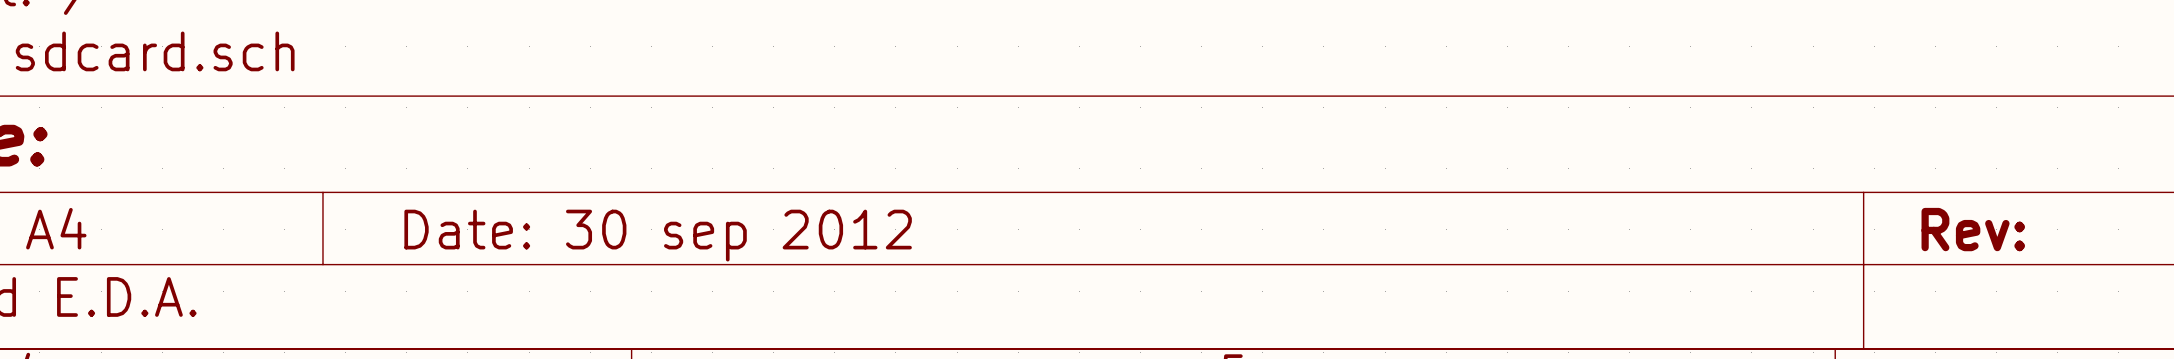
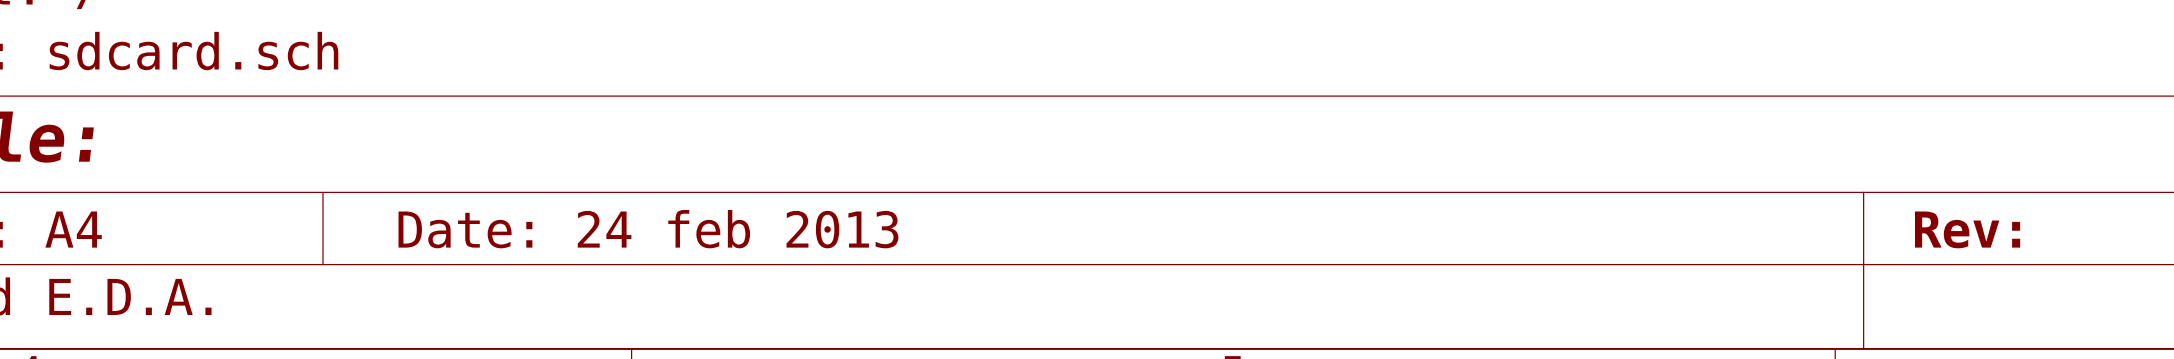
title block: Date: 30 sep 2012 (658, 235) -> Date: 24 feb 2013 (648, 229)

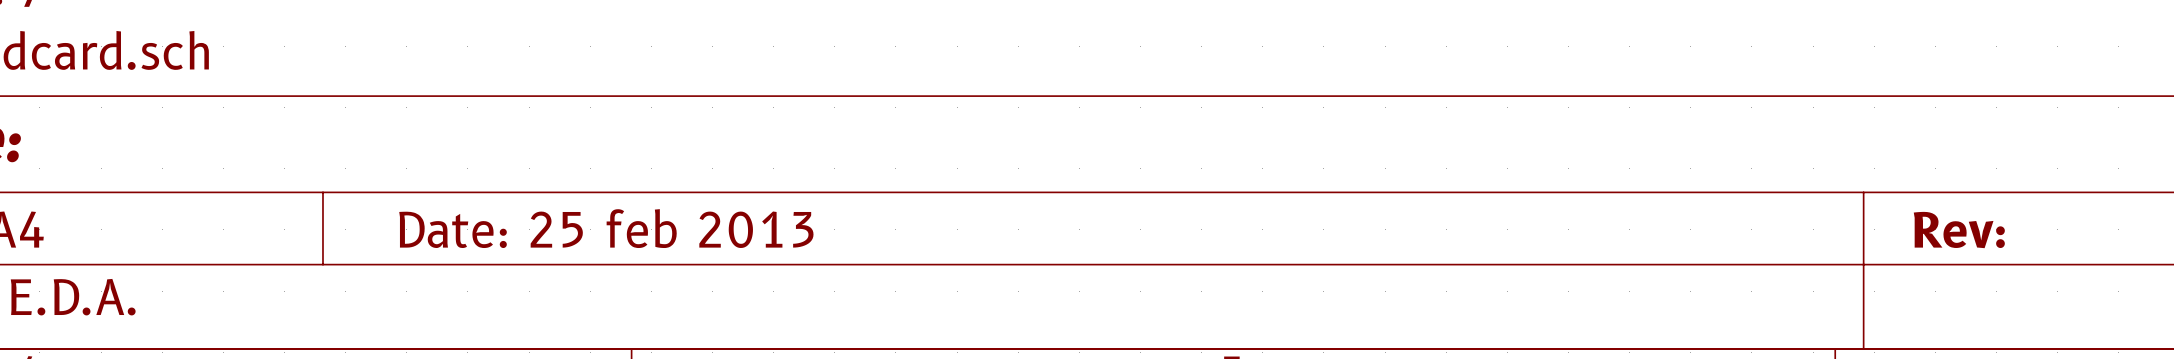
title block: Date: 24 feb 2013 (648, 229) -> Date: 25 feb 2013 (606, 228)

